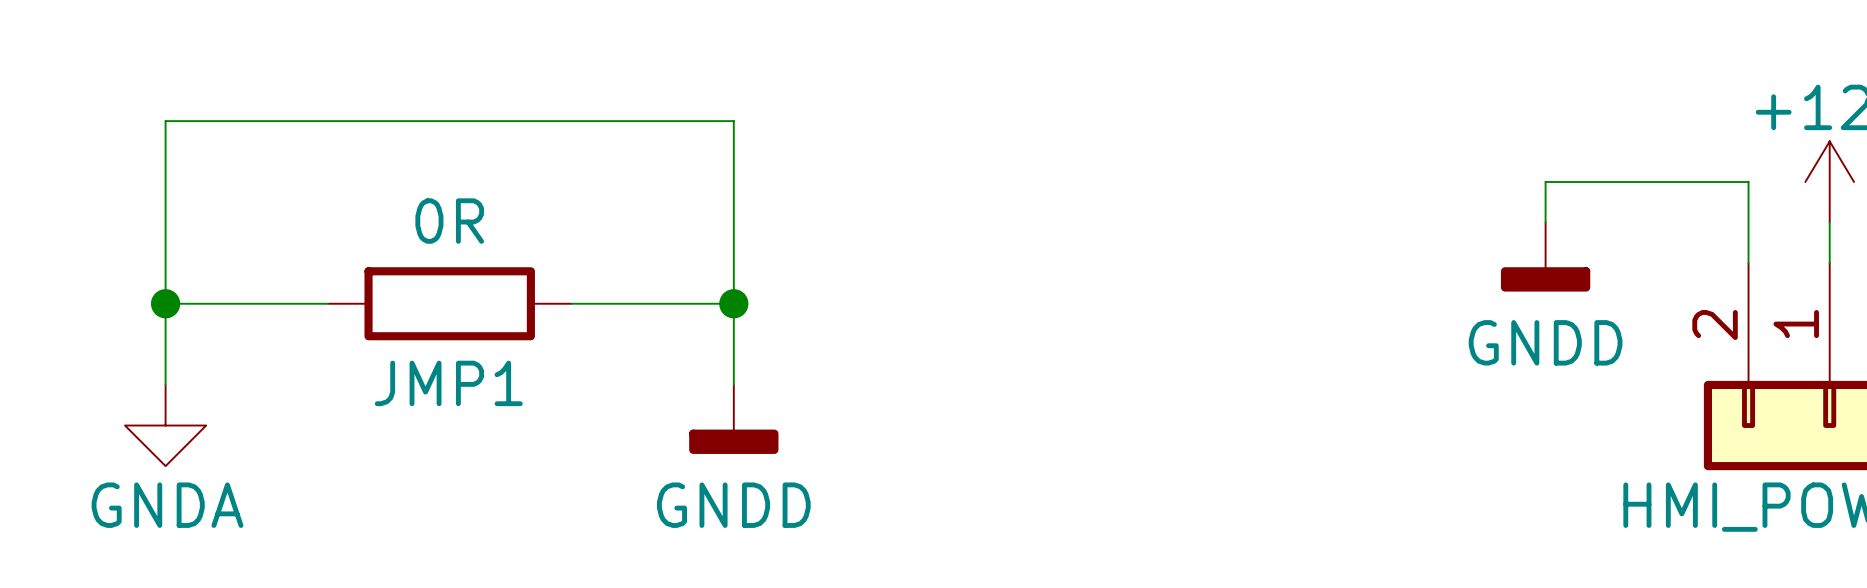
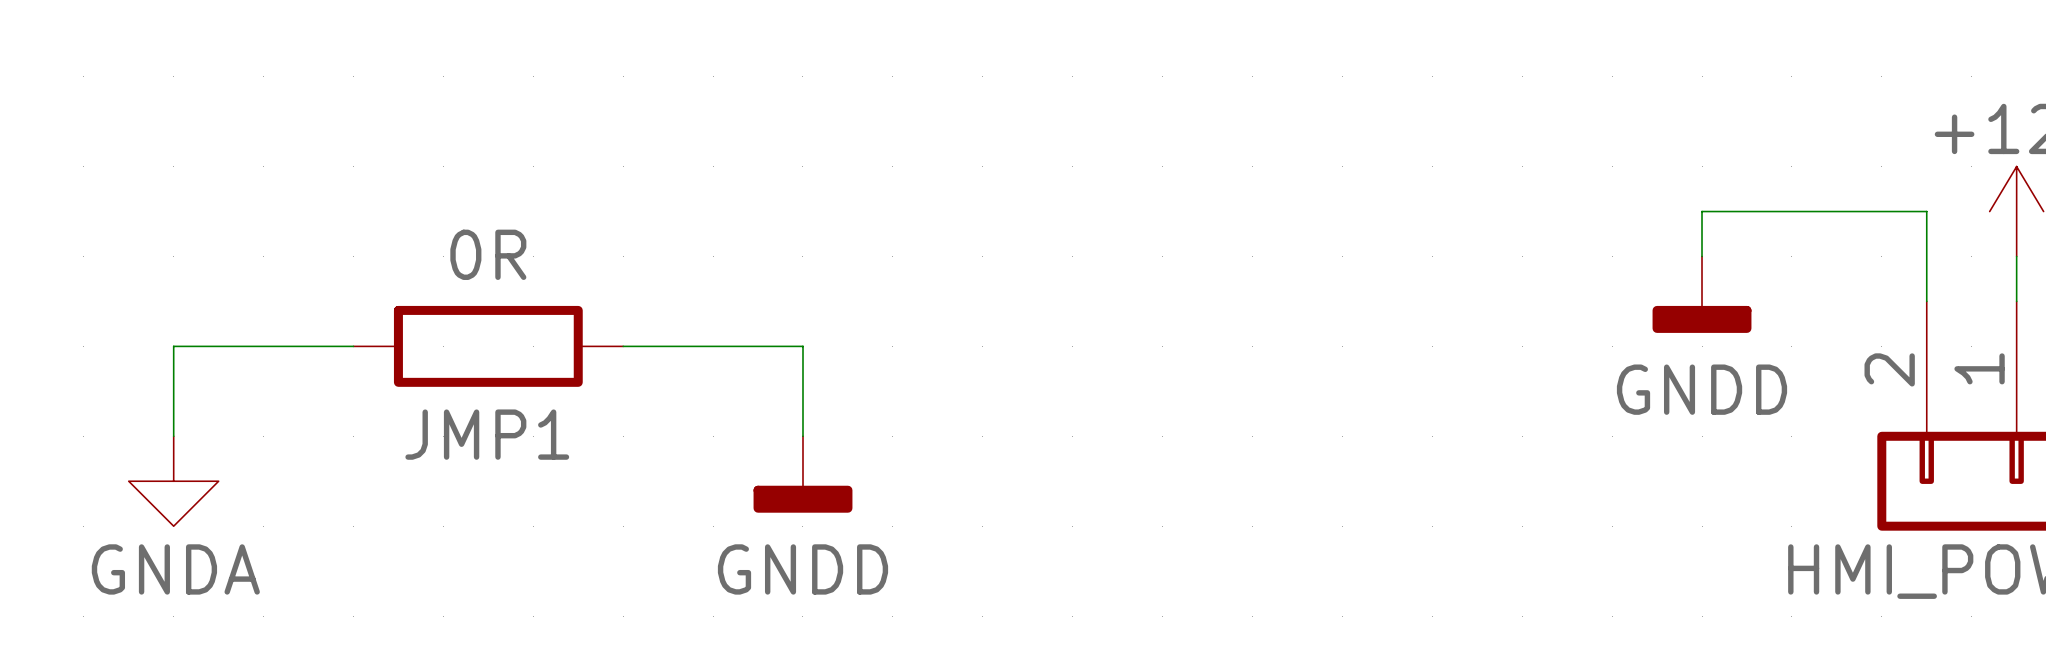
wire: (165, 303) (165, 121) (733, 121) (733, 303) -> none
junction: (165, 303) -> none
junction: (733, 303) -> none

